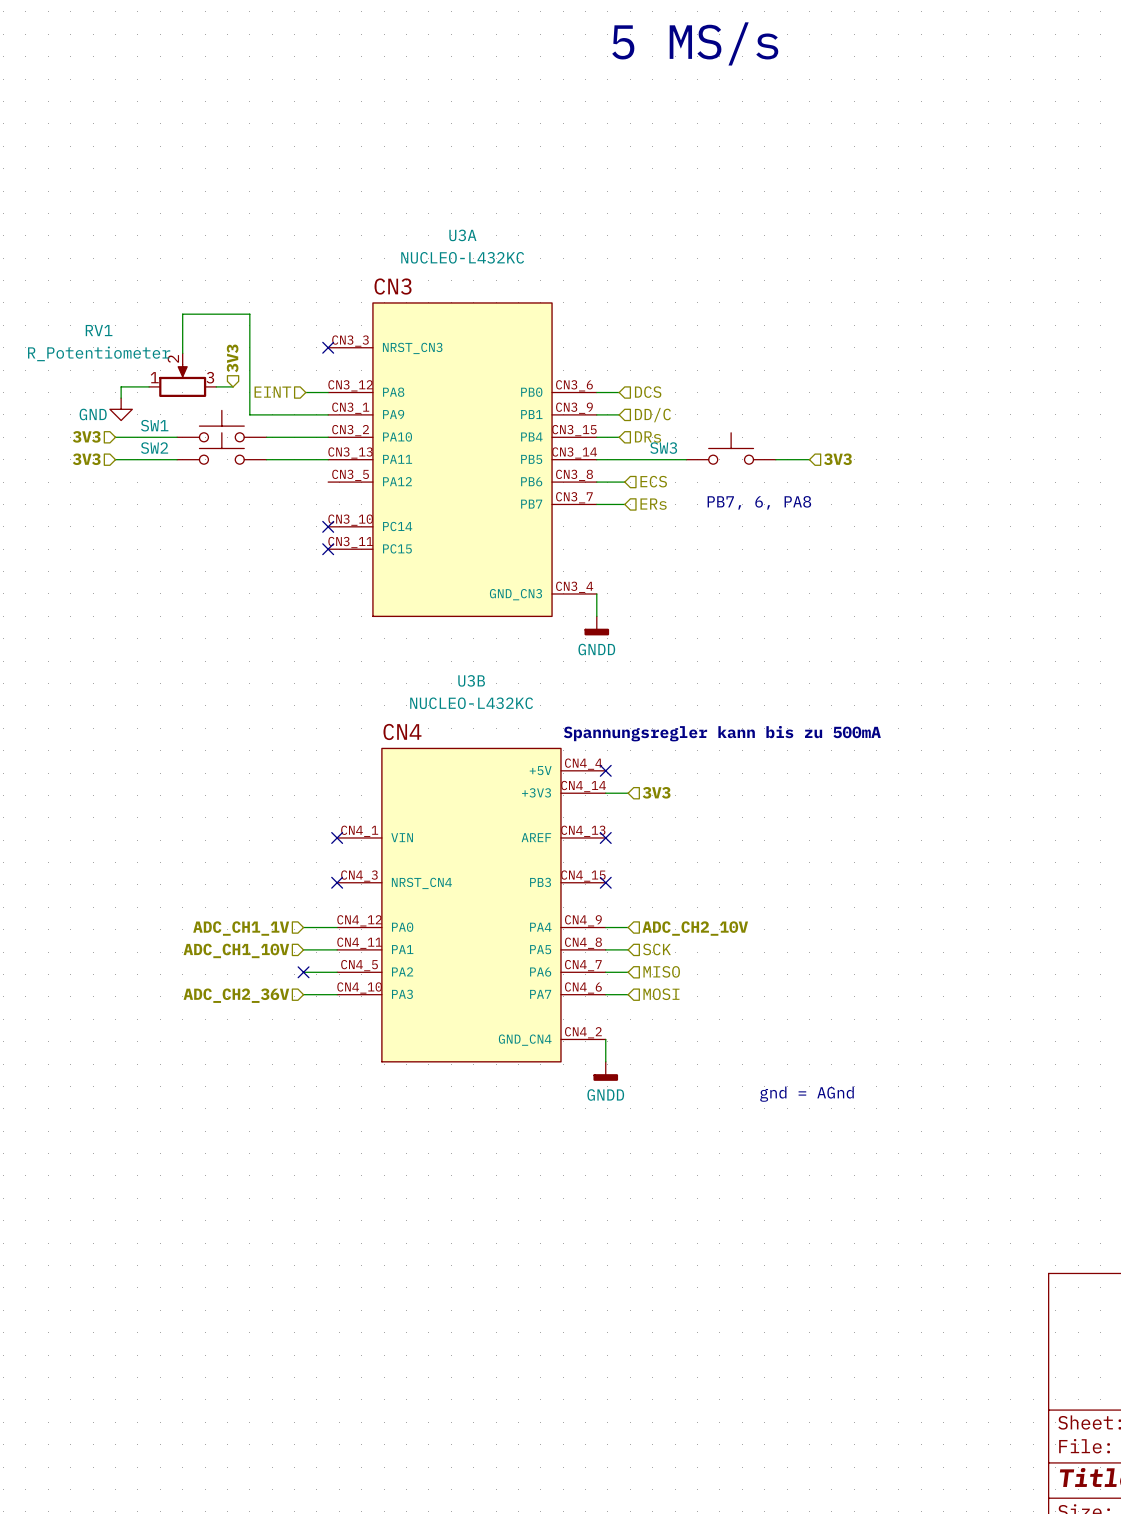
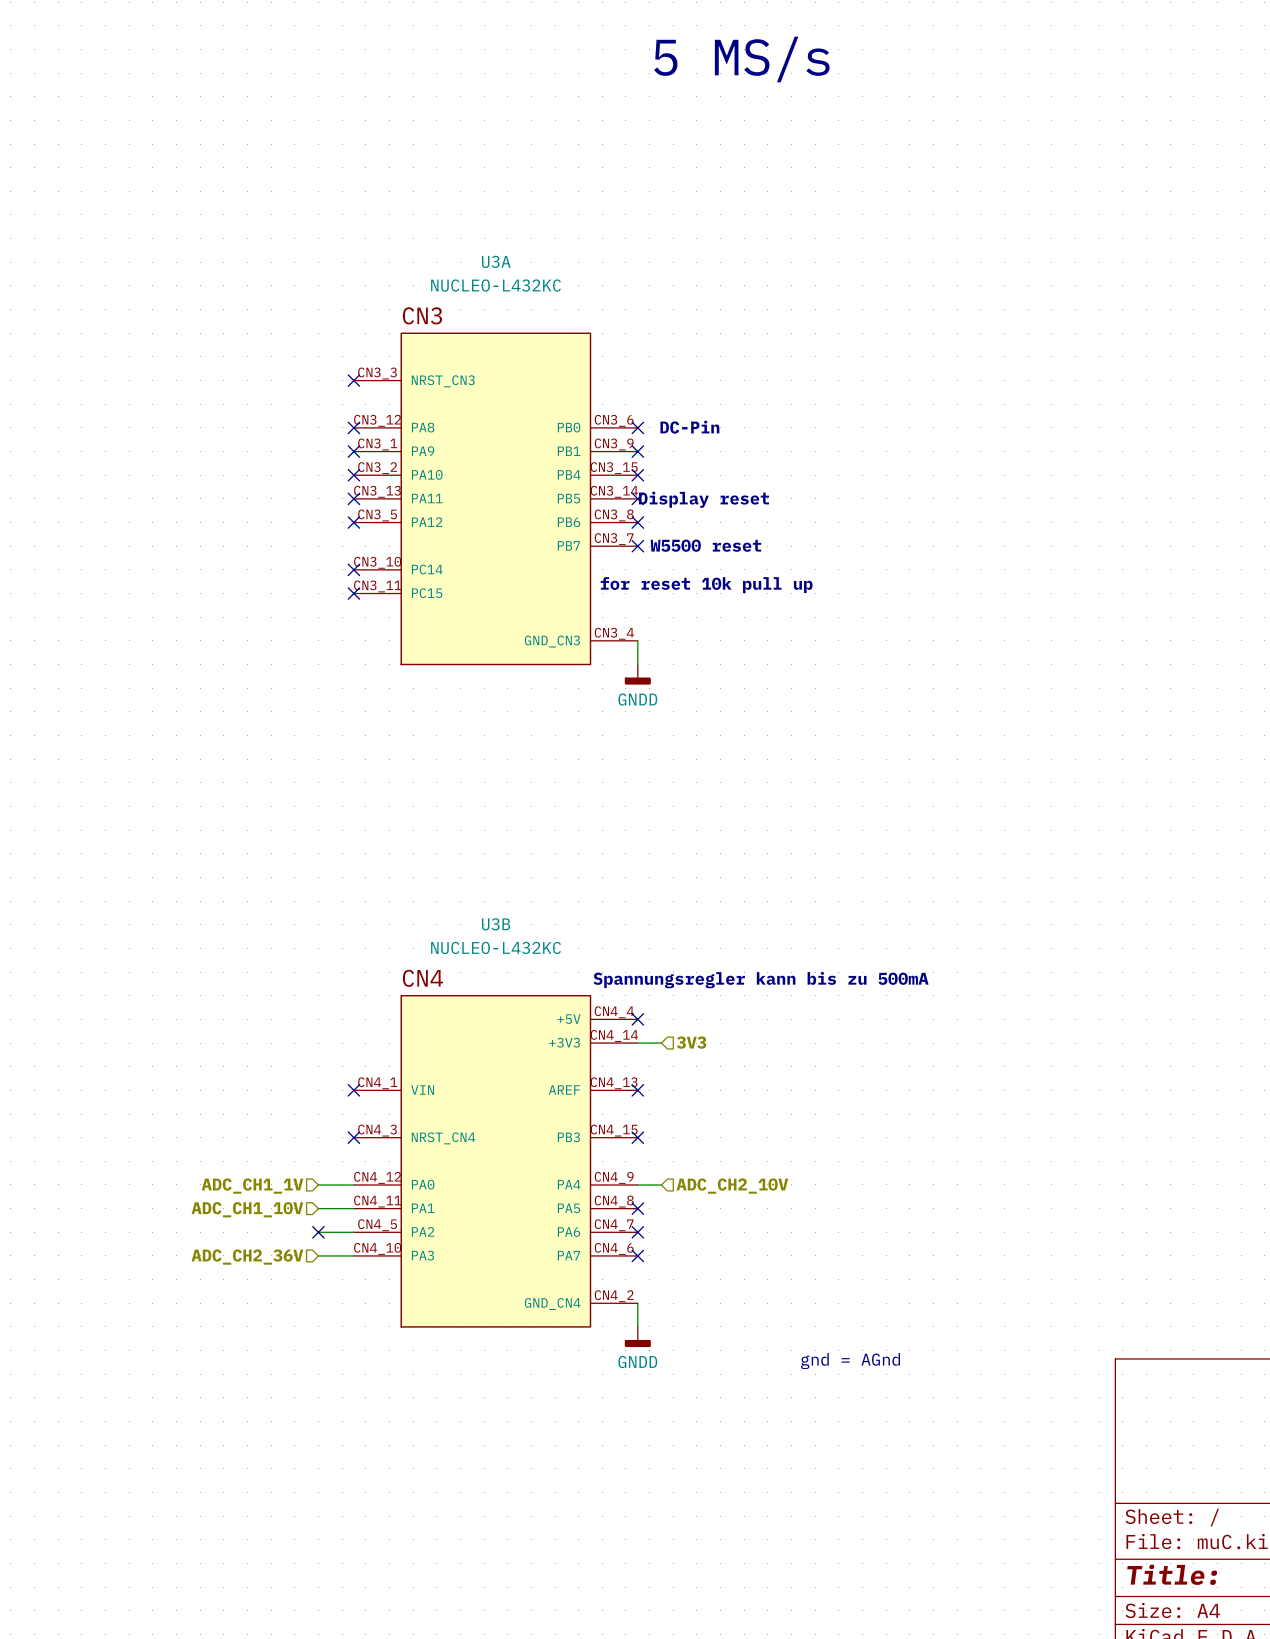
wire: (182, 353) (182, 314) (249, 314) (249, 414) (328, 414) -> none
hierarchical label: 3V3 (232, 358) -> none
RV1: R_Potentiometer (182, 375) -> none
wire: (149, 386) (121, 386) (121, 398) -> none
wire: (216, 386) (233, 386) -> none
text: none -> DC-Pin (689, 427)
hierarchical label: EINT (272, 392) -> none
wire: (305, 392) (328, 392) -> none
no-connect mark: none -> (353, 427)
wire: (596, 392) (619, 392) -> none
no-connect mark: none -> (637, 427)
hierarchical label: DCS (648, 392) -> none
power symbol: GND (121, 409) -> none
no-connect mark: none -> (353, 451)
wire: (596, 414) (619, 414) -> none
no-connect mark: none -> (637, 451)
hierarchical label: DD/C (652, 415) -> none
SW1: (221, 426) -> none
hierarchical label: 3V3 (86, 436) -> none
hierarchical label: DRs (647, 436) -> none
wire: (115, 437) (177, 437) -> none
wire: (266, 437) (328, 437) -> none
no-connect mark: none -> (353, 475)
wire: (596, 437) (619, 437) -> none
no-connect mark: none -> (637, 475)
SW2: (221, 448) -> none
SW3: (731, 448) -> none
hierarchical label: 3V3 (86, 459) -> none
wire: (115, 459) (177, 459) -> none
wire: (266, 459) (328, 459) -> none
no-connect mark: none -> (353, 498)
wire: (596, 459) (686, 459) -> none
no-connect mark: none -> (637, 498)
wire: (775, 459) (809, 459) -> none
hierarchical label: 3V3 (837, 459) -> none
text: none -> Display reset (704, 499)
hierarchical label: ECS (653, 481) -> none
no-connect mark: none -> (353, 522)
wire: (596, 482) (624, 482) -> none
no-connect mark: none -> (637, 522)
text: PB7, 6, PA8 (759, 502) -> none
text: none -> W5500 reset (705, 545)
wire: (596, 504) (624, 504) -> none
no-connect mark: none -> (637, 546)
hierarchical label: ERs (653, 504) -> none
text: none -> for reset 10k pull up (706, 585)
text position: Spannungsregler kann bis zu 500mA (722, 733) -> Spannungsregler kann bis zu 500mA (761, 980)
no-connect mark: (605, 770) -> none
hierarchical label position: 3V3 (656, 792) -> 3V3 (691, 1042)
wire: (605, 793) (628, 793) -> (637, 1043) (661, 1043)
no-connect mark: (337, 837) -> none
no-connect mark: (605, 837) -> none
no-connect mark: (337, 882) -> none
no-connect mark: (605, 882) -> none
U3B position: (471, 905) -> (495, 1161)
wire: (303, 927) (337, 927) -> (318, 1184) (353, 1184)
wire: (605, 927) (628, 927) -> (637, 1184) (661, 1184)
hierarchical label position: ADC_CH1_1V (241, 928) -> ADC_CH1_1V (252, 1186)
hierarchical label position: ADC_CH2_10V (695, 928) -> ADC_CH2_10V (732, 1186)
wire: (303, 949) (337, 949) -> (318, 1208) (353, 1208)
wire: (605, 949) (628, 949) -> none
hierarchical label: SCK (656, 949) -> none
hierarchical label position: ADC_CH1_10V (236, 950) -> ADC_CH1_10V (247, 1209)
no-connect mark: none -> (637, 1019)
hierarchical label: MISO (661, 971) -> none
wire: (303, 972) (337, 972) -> (318, 1232) (353, 1232)
no-connect mark: (303, 972) -> none
wire: (605, 972) (628, 972) -> none
wire: (303, 994) (337, 994) -> (318, 1255) (353, 1255)
wire: (605, 994) (628, 994) -> none
hierarchical label: MOSI (661, 994) -> none
hierarchical label position: ADC_CH2_36V (236, 995) -> ADC_CH2_36V (247, 1257)
no-connect mark: none -> (353, 1090)
no-connect mark: none -> (637, 1090)
wire: (605, 1039) (605, 1061) -> (637, 1303) (637, 1326)
no-connect mark: none -> (353, 1137)
no-connect mark: none -> (637, 1137)
power symbol position: GNDD (605, 1071) -> GNDD (637, 1337)
text position: gnd = AGnd (806, 1094) -> gnd = AGnd (850, 1361)
no-connect mark: none -> (637, 1208)
no-connect mark: none -> (318, 1232)
no-connect mark: none -> (637, 1232)
no-connect mark: none -> (637, 1255)

